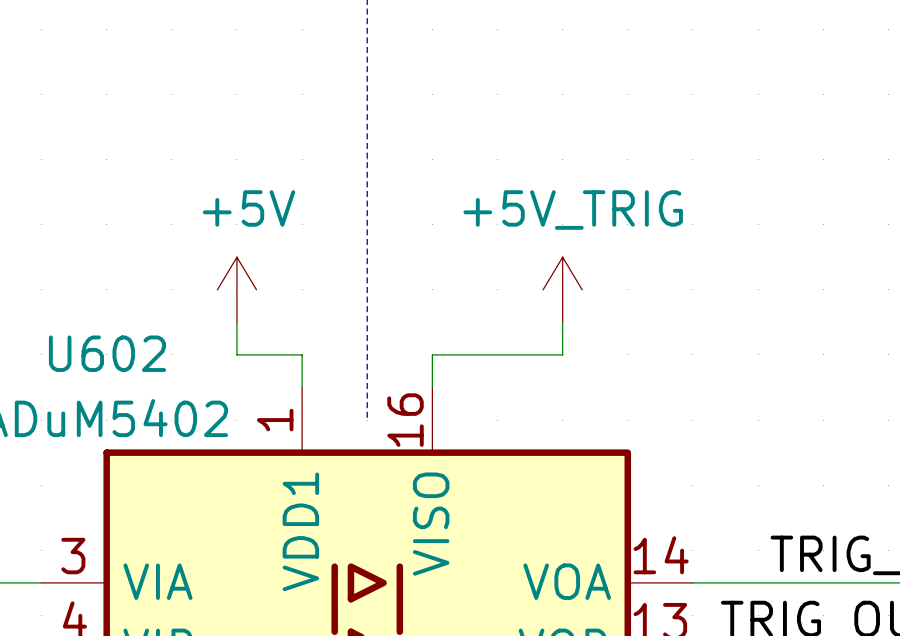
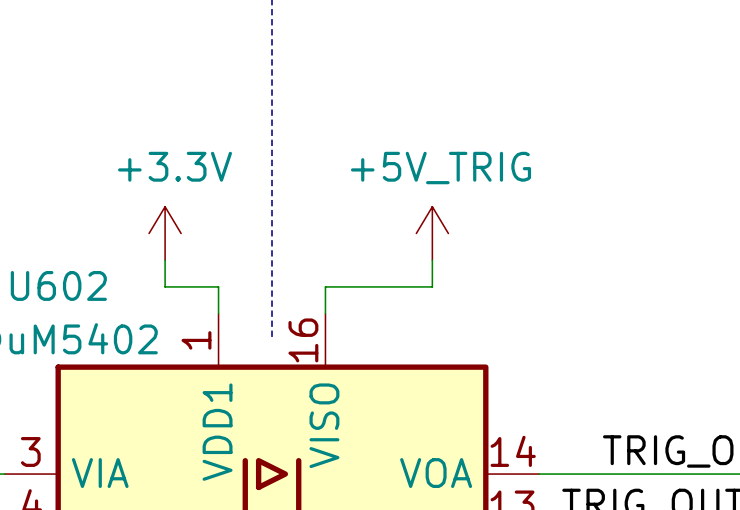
power symbol: +5V (236, 289) -> +3.3V (165, 233)

